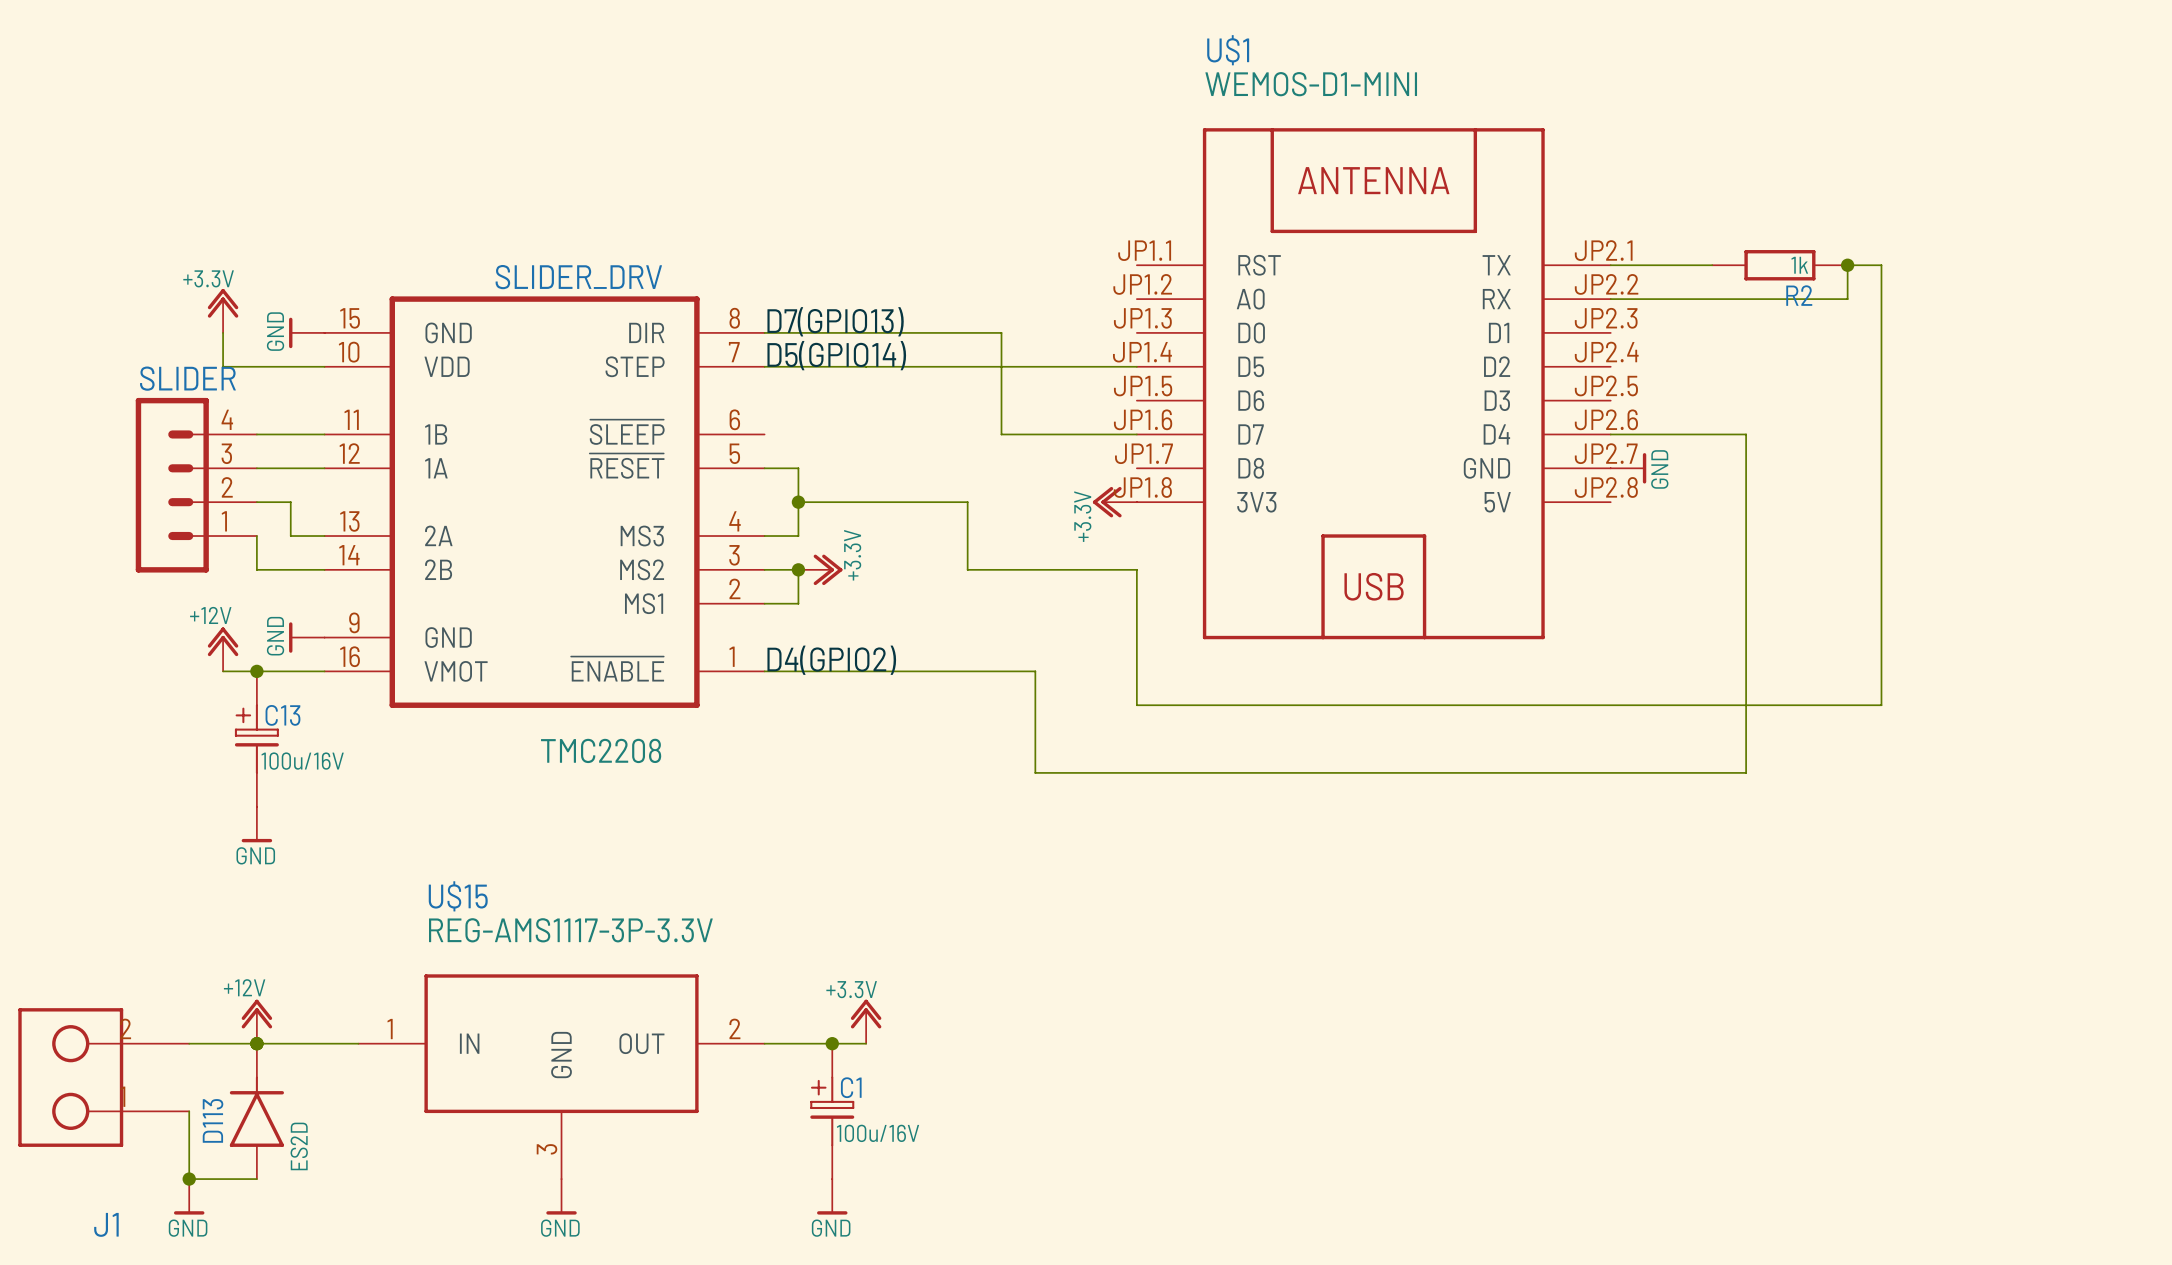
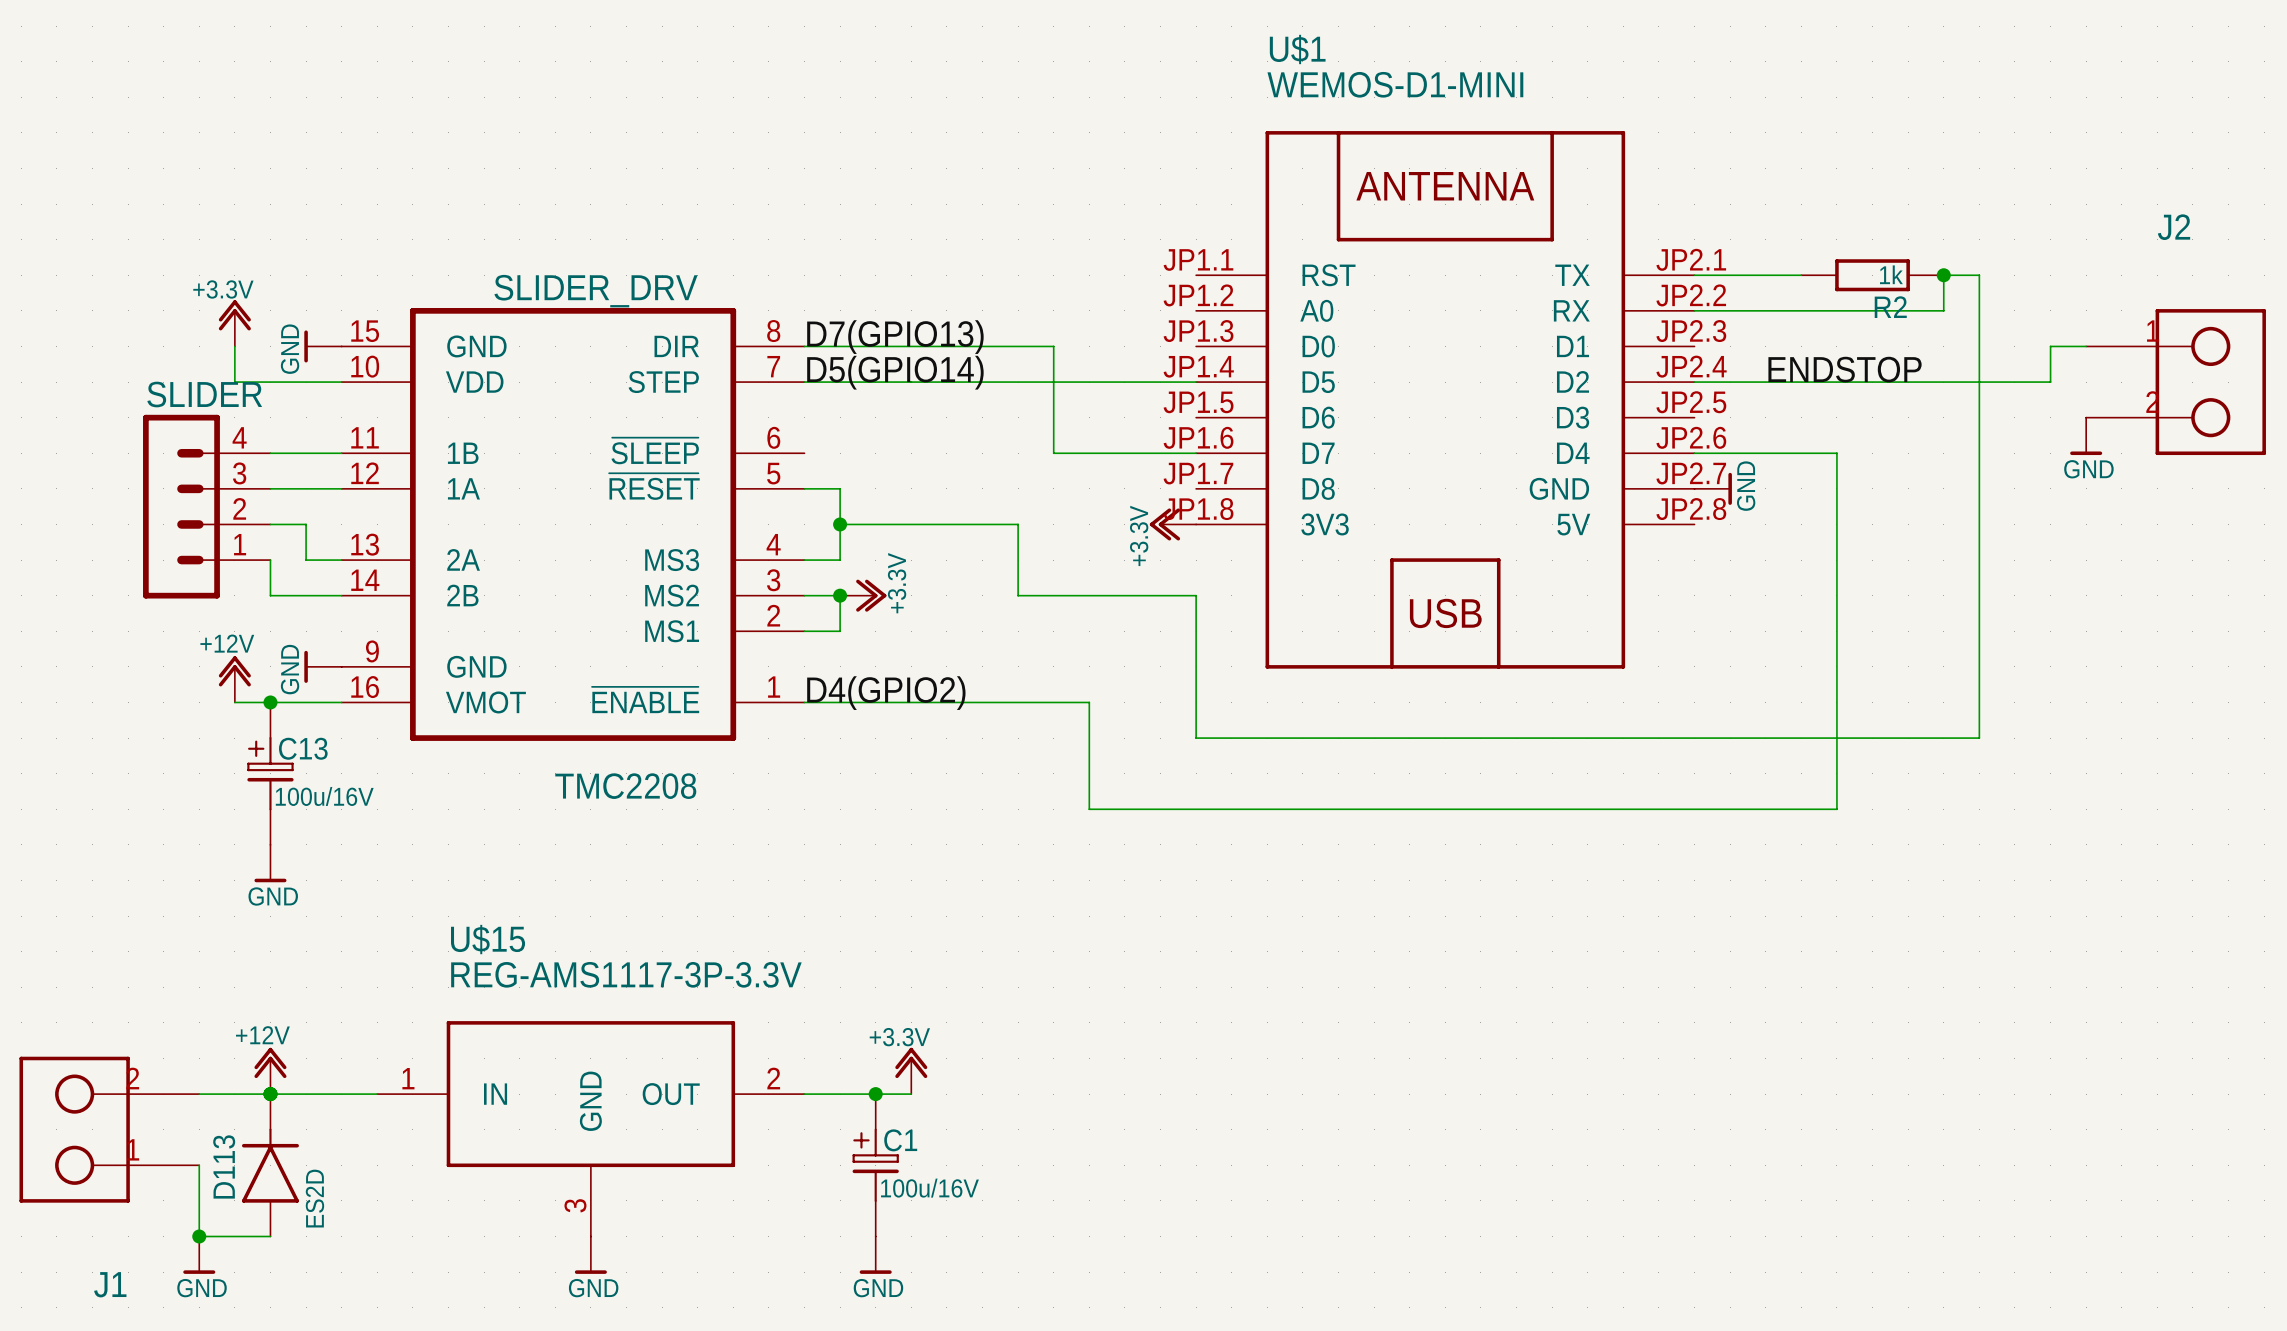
wire: none -> (2086, 346) (2050, 346) (2050, 382) (1694, 382)
label: none -> ENDSTOP (1845, 369)
J2: none -> (2176, 382)
power symbol: none -> GND (2086, 436)

